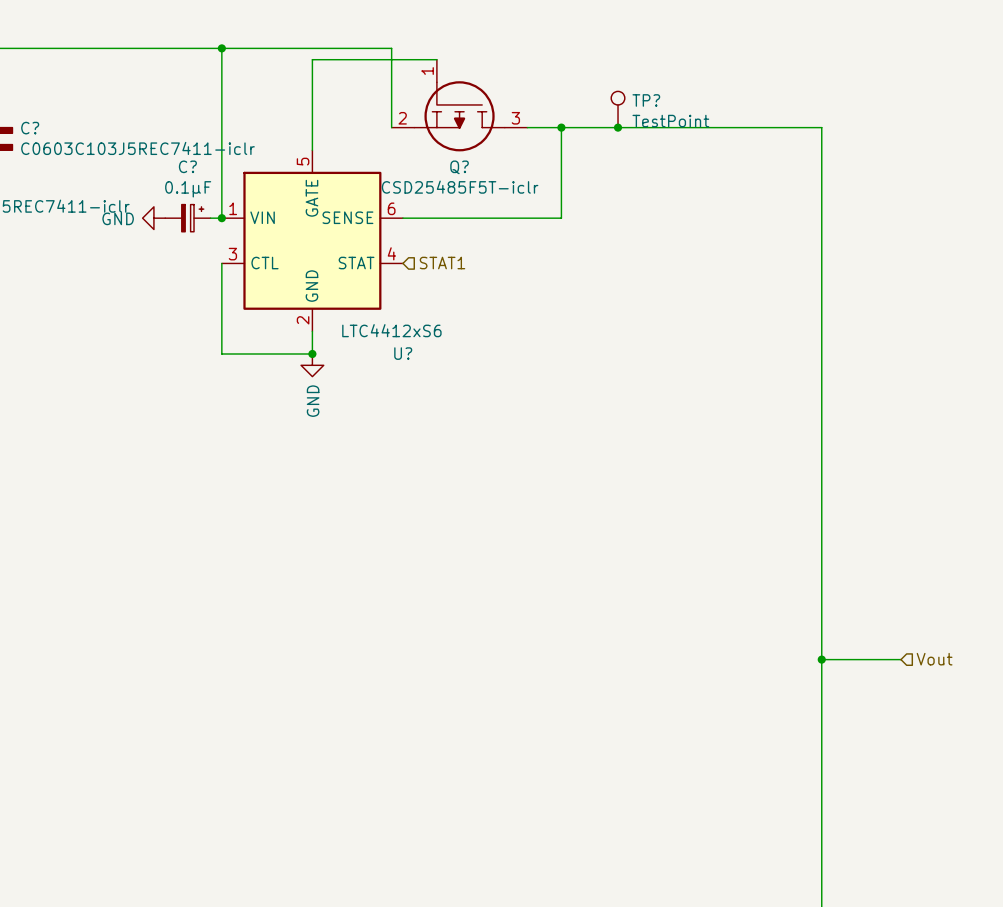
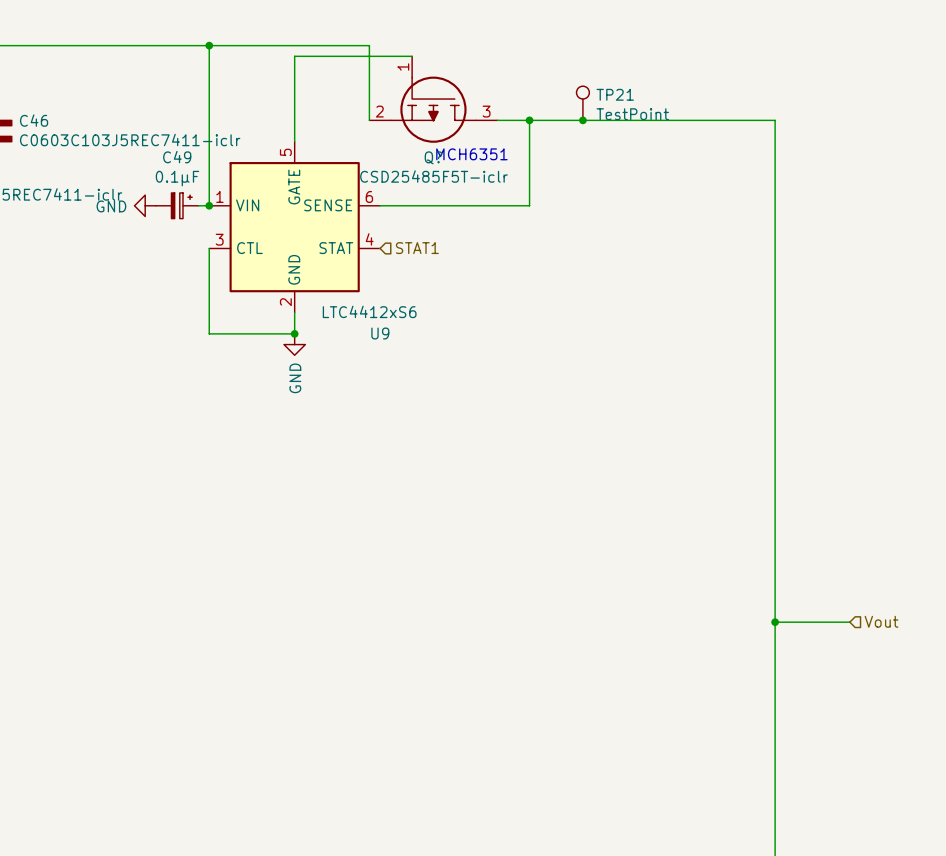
TP? name: TP? (646, 100) -> TP21 (615, 94)
C? name: C? (30, 128) -> C46 (34, 120)
text: none -> MCH6351 (471, 154)
C? name: C? (187, 166) -> C49 (177, 157)
U? name: U? (403, 353) -> U9 (380, 333)

